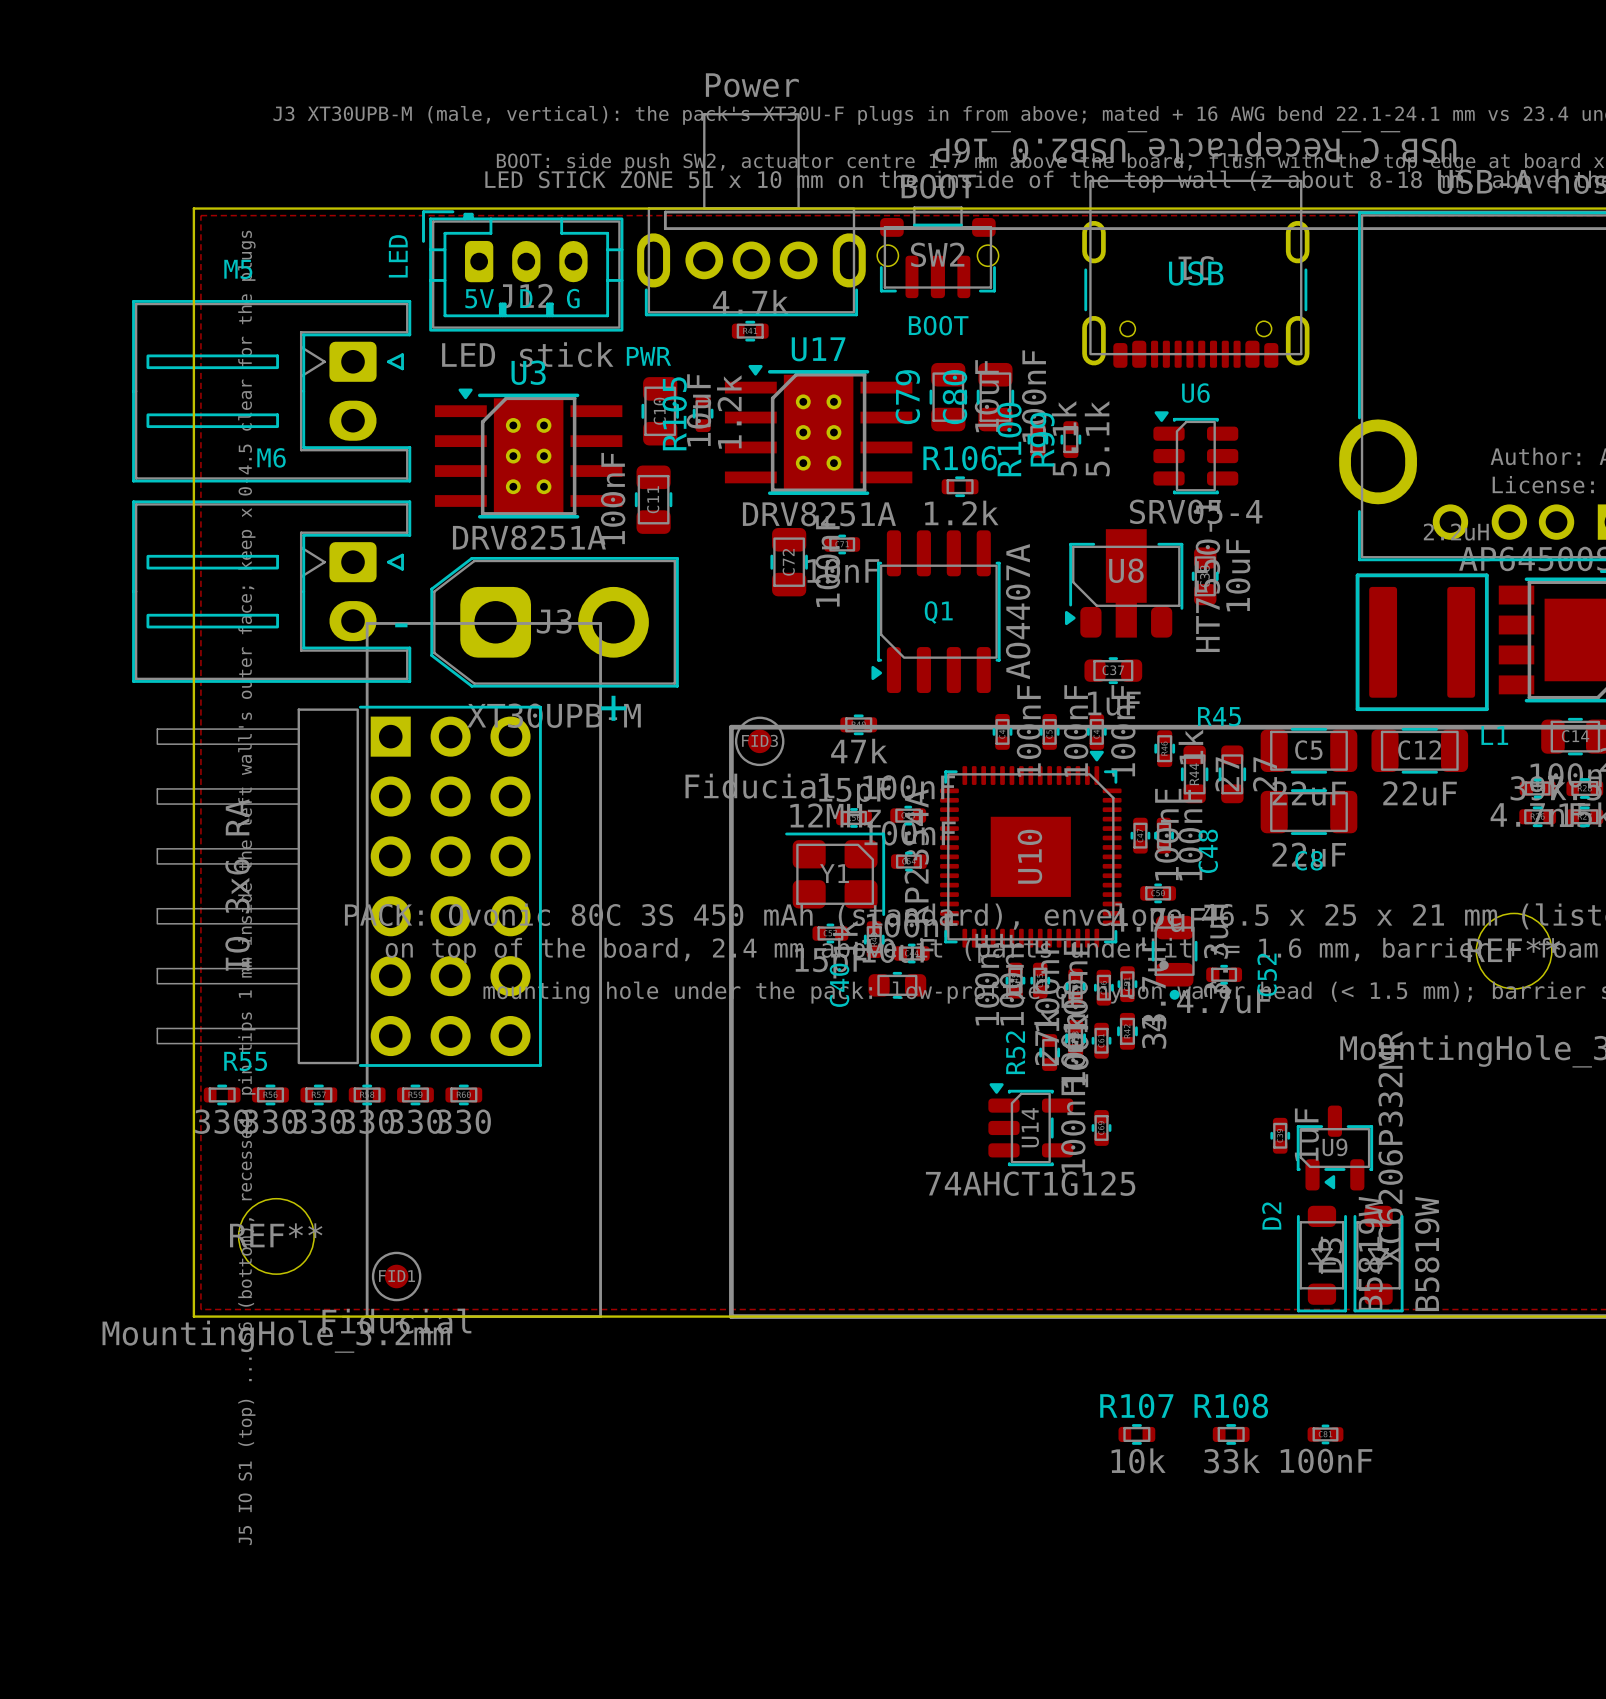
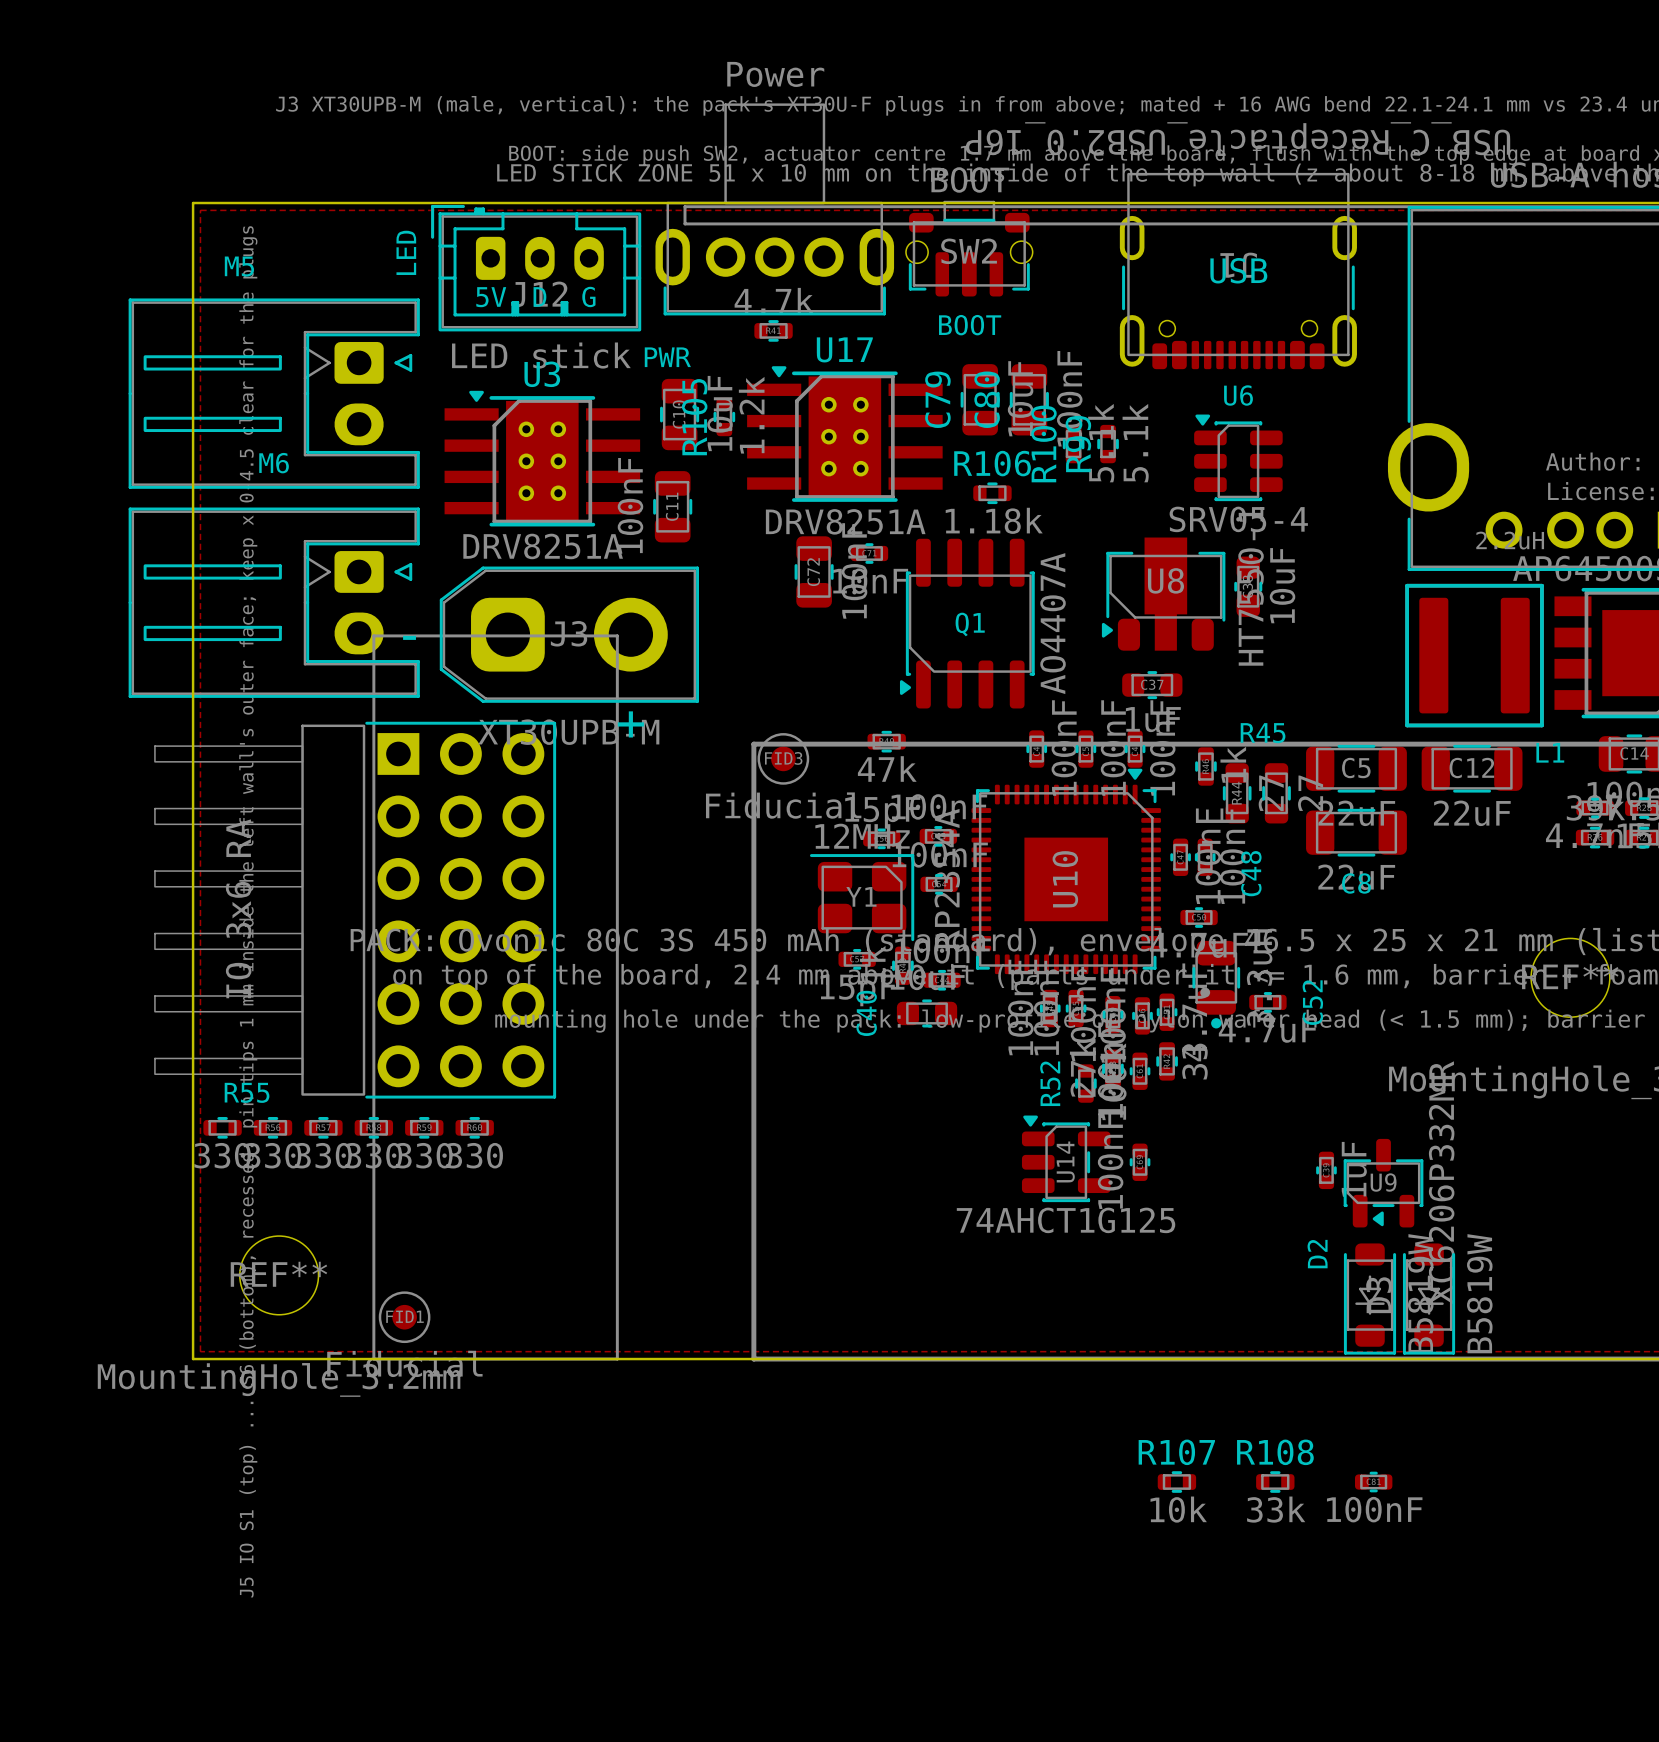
R106 value: 1.2k (961, 512) -> 1.18k (994, 520)

